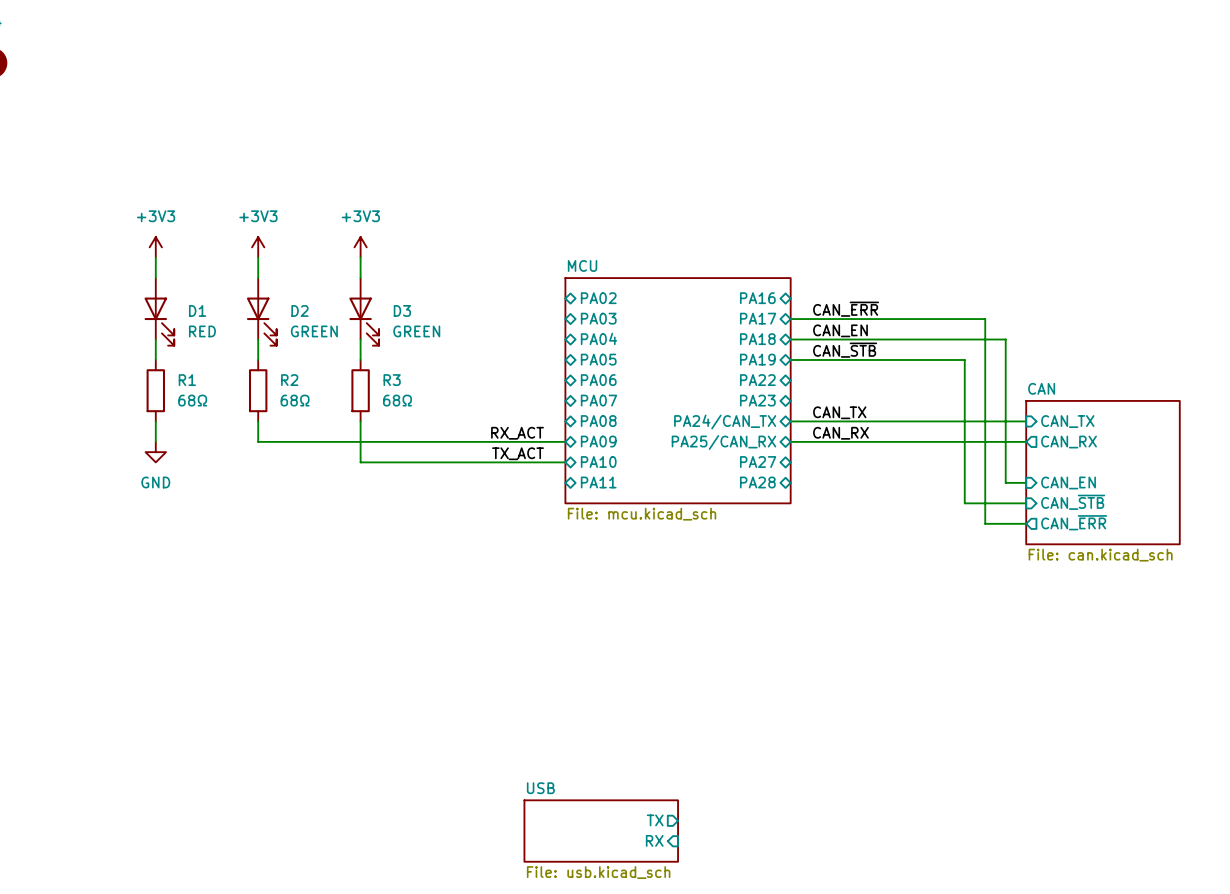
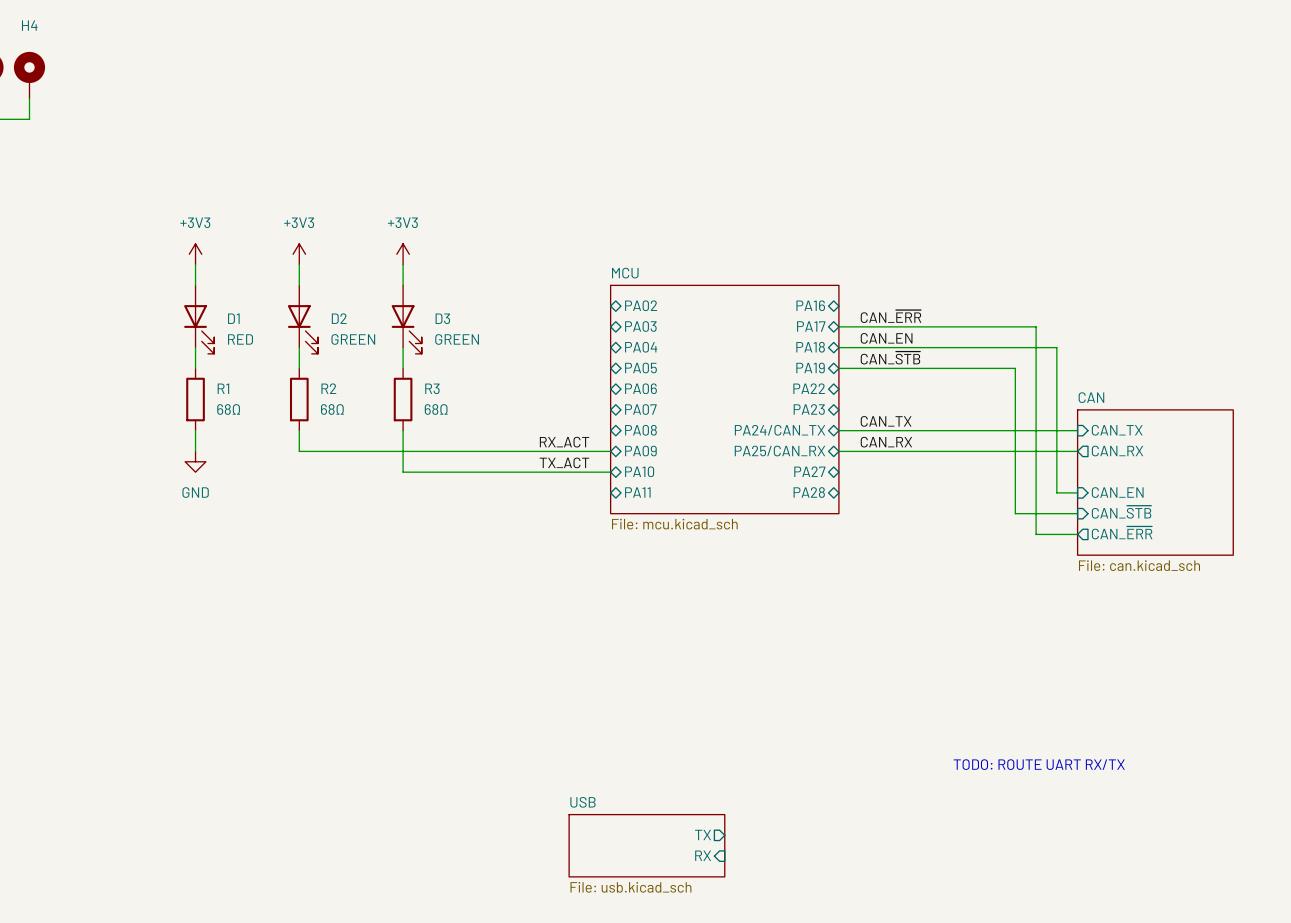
text: none -> TODO: ROUTE UART RX/TX (1039, 764)

